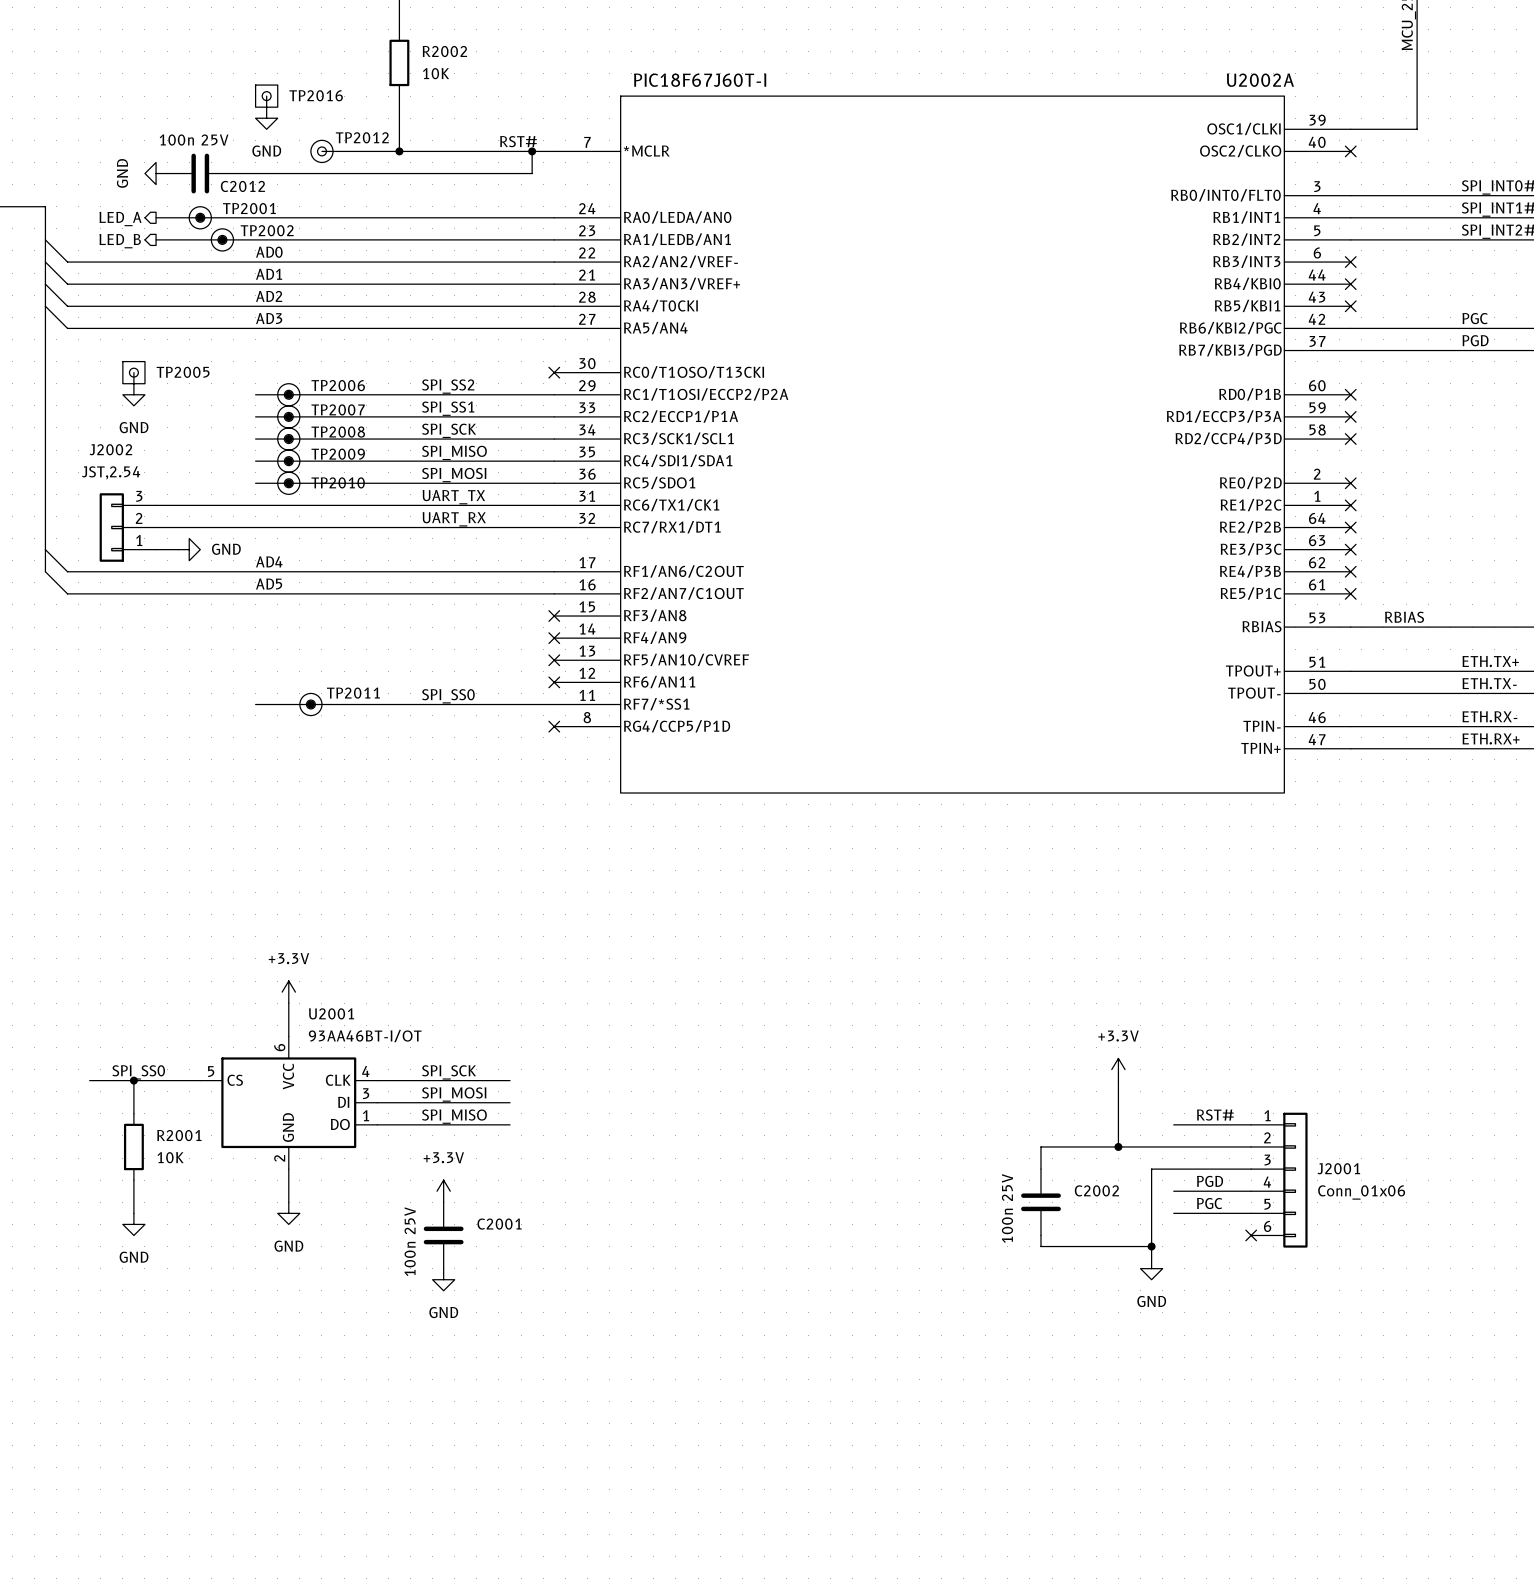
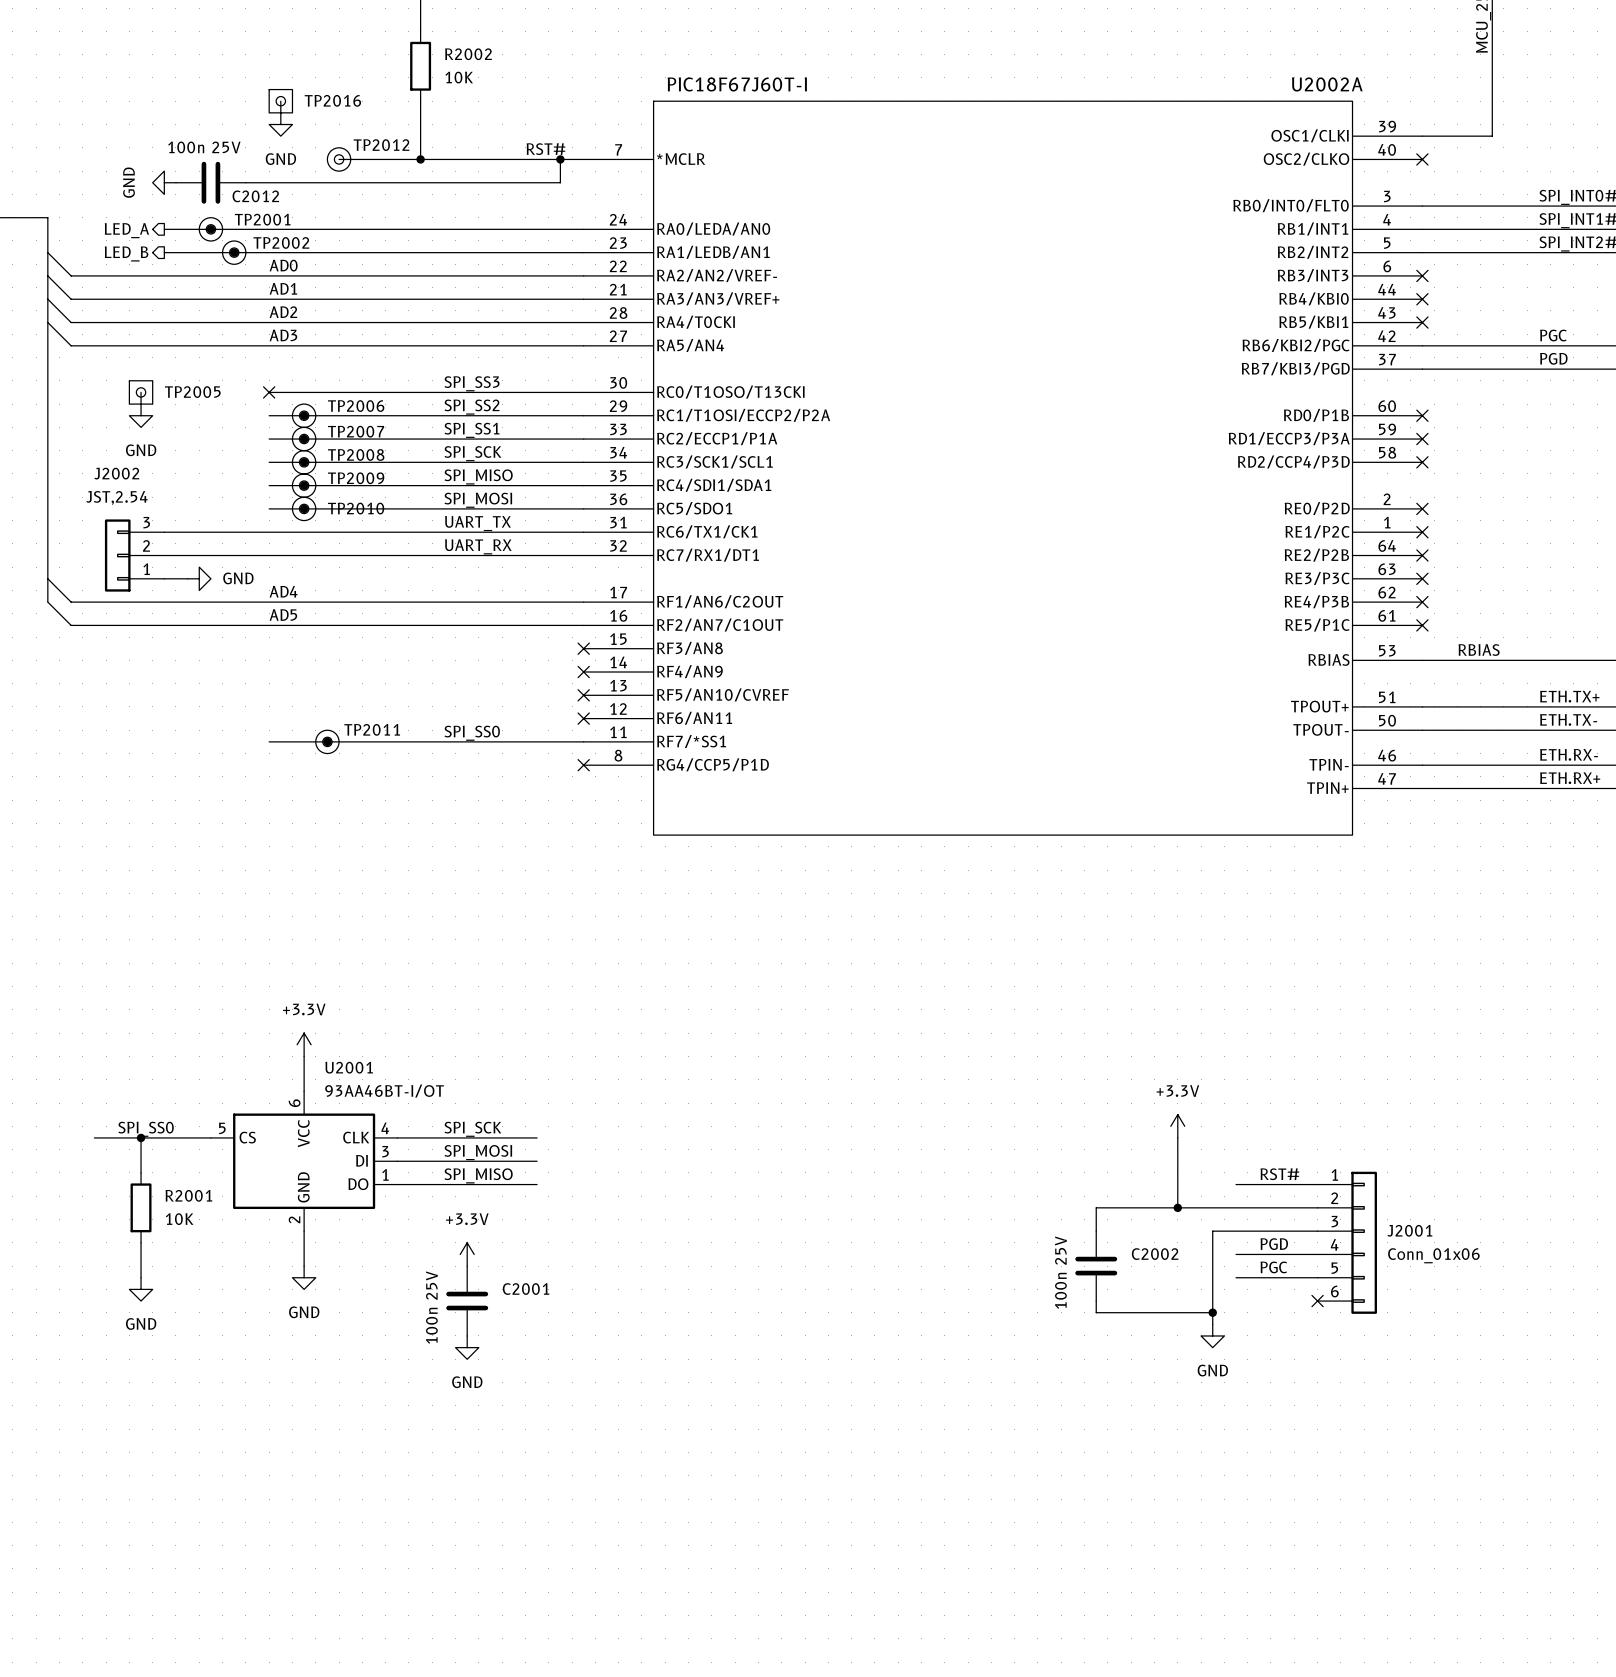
label: none -> SPI_SS3 (472, 383)
wire: none -> (269, 392) (583, 392)
no-connect mark: none -> (269, 392)
no-connect mark: (554, 372) -> none

